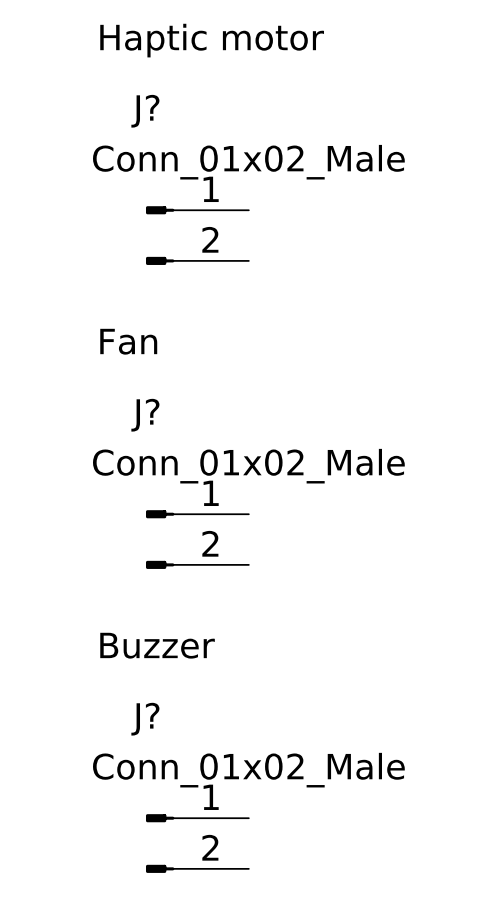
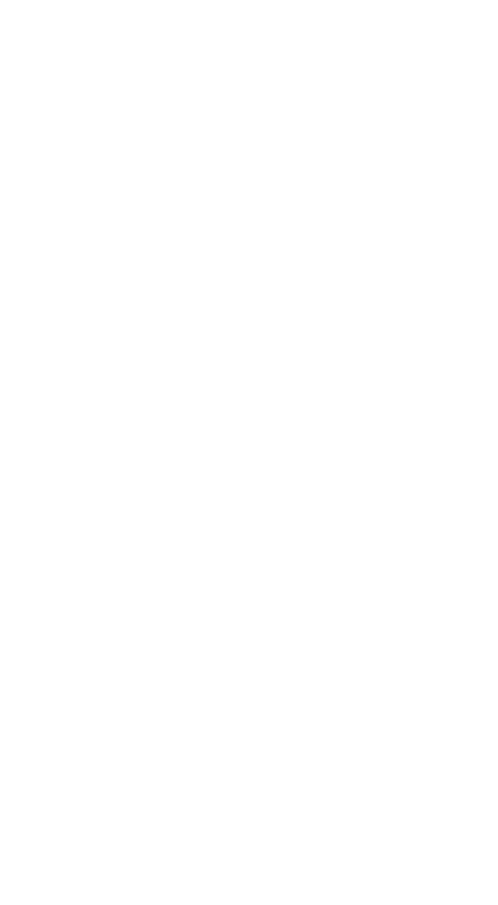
text: Haptic motor (212, 40) -> none
J?: Conn_01x02_Male (197, 235) -> none
text: Fan (128, 341) -> none
J?: Conn_01x02_Male (197, 539) -> none
text: Buzzer (157, 645) -> none
J?: Conn_01x02_Male (197, 843) -> none

